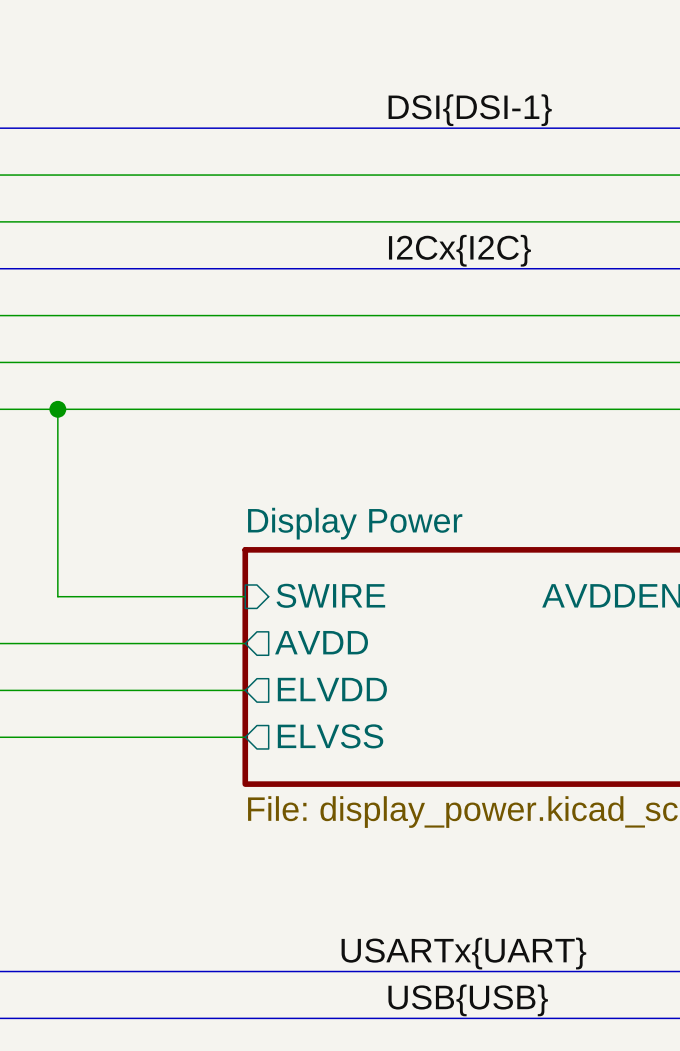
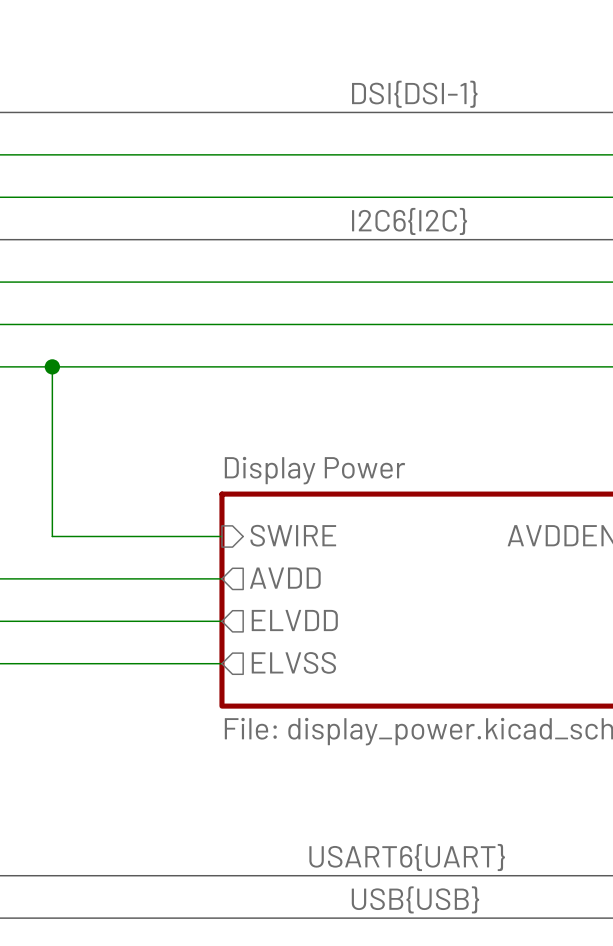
label: I2Cx{I2C} (459, 250) -> I2C6{I2C} (409, 221)
label: USARTx{UART} (463, 953) -> USART6{UART} (407, 857)

